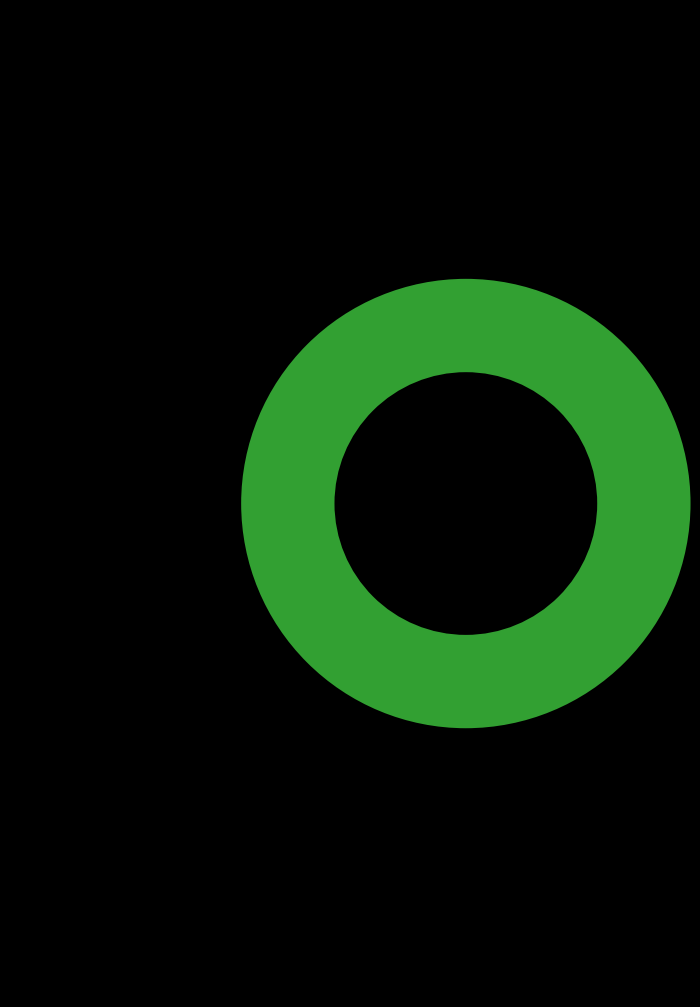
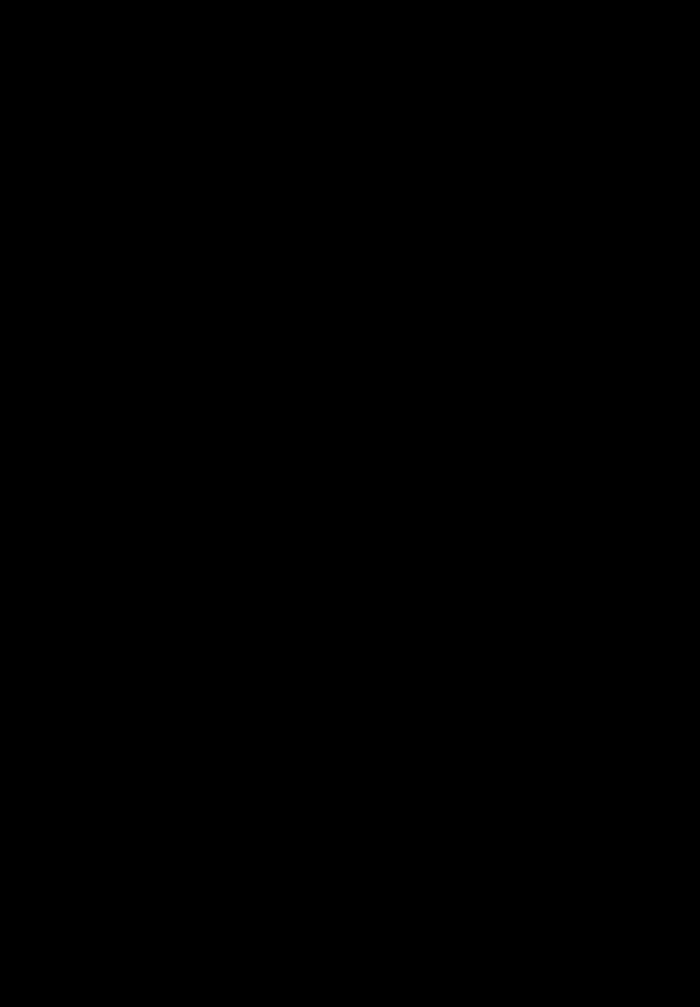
part: (465, 503) -> none

